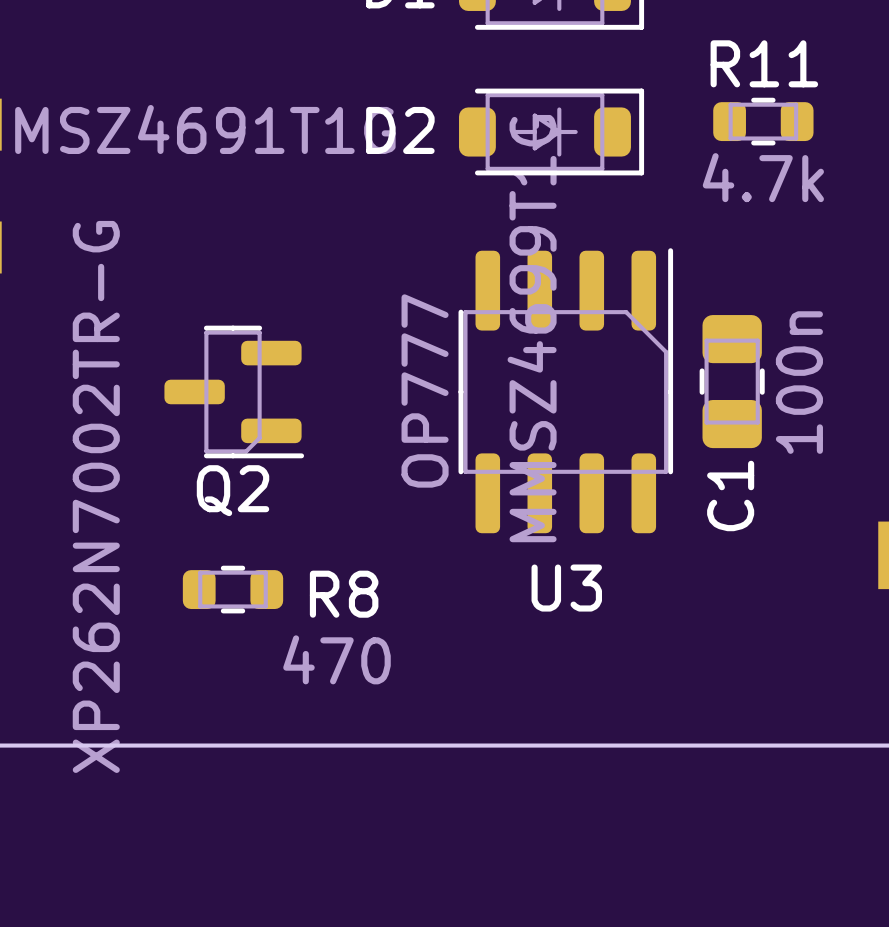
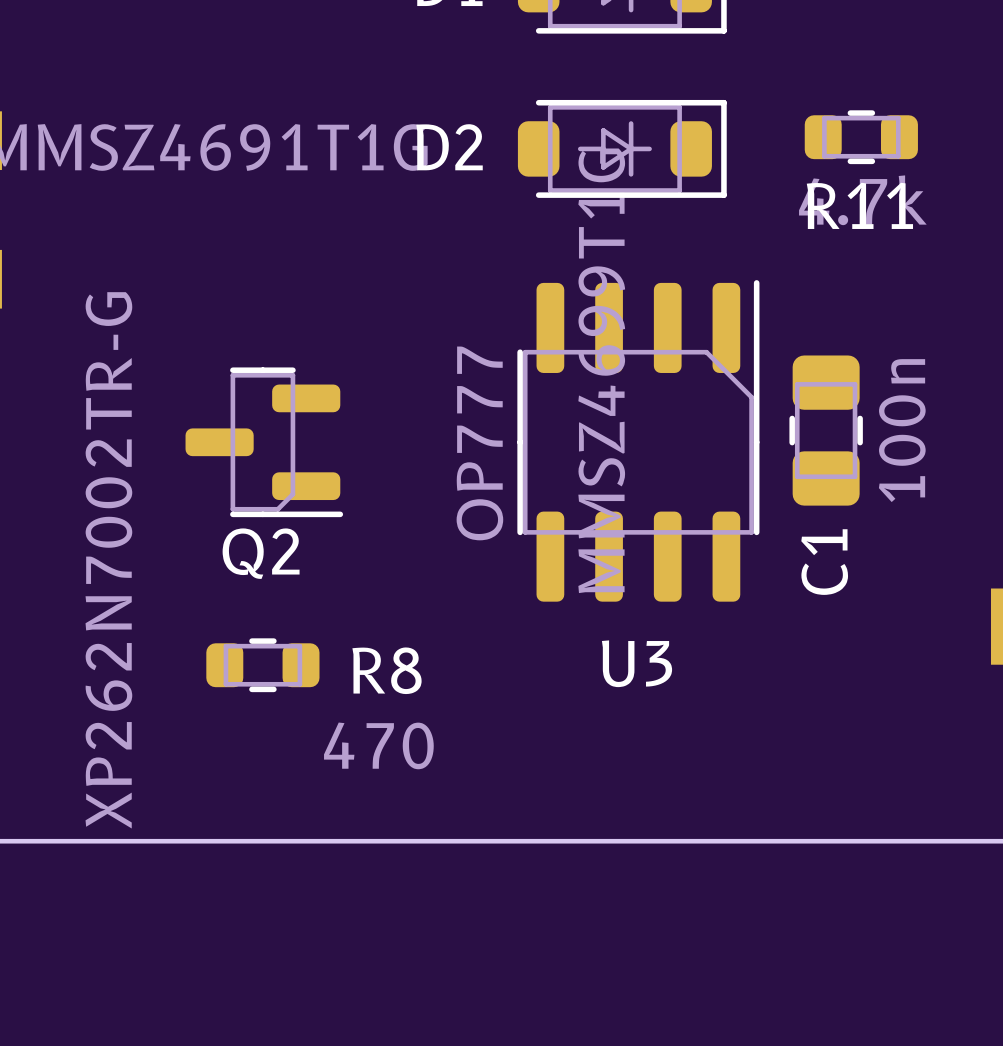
R11 name position: R11 (764, 63) -> R11 (859, 205)

